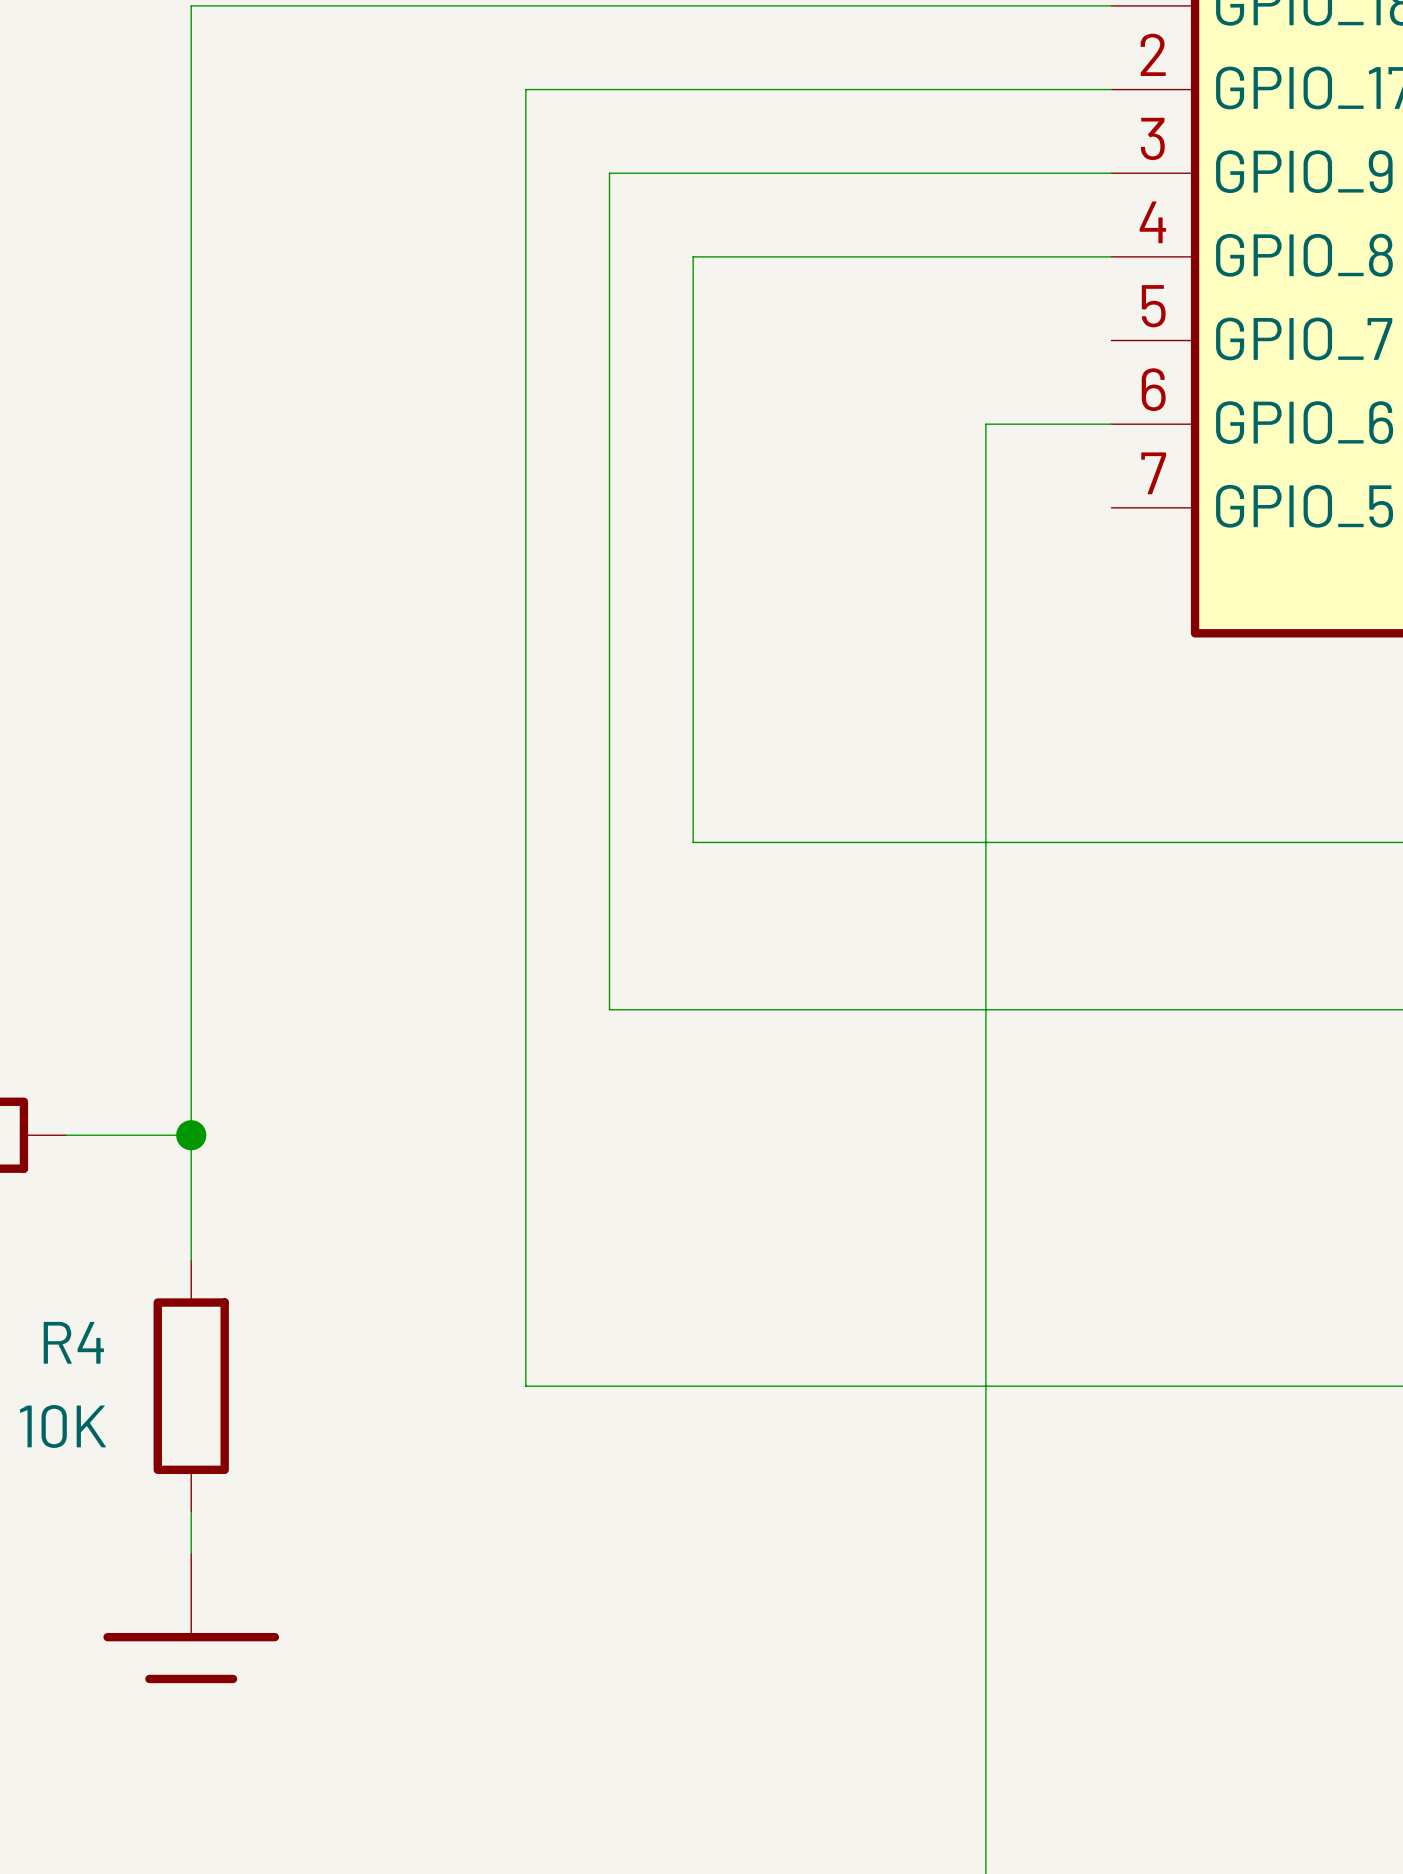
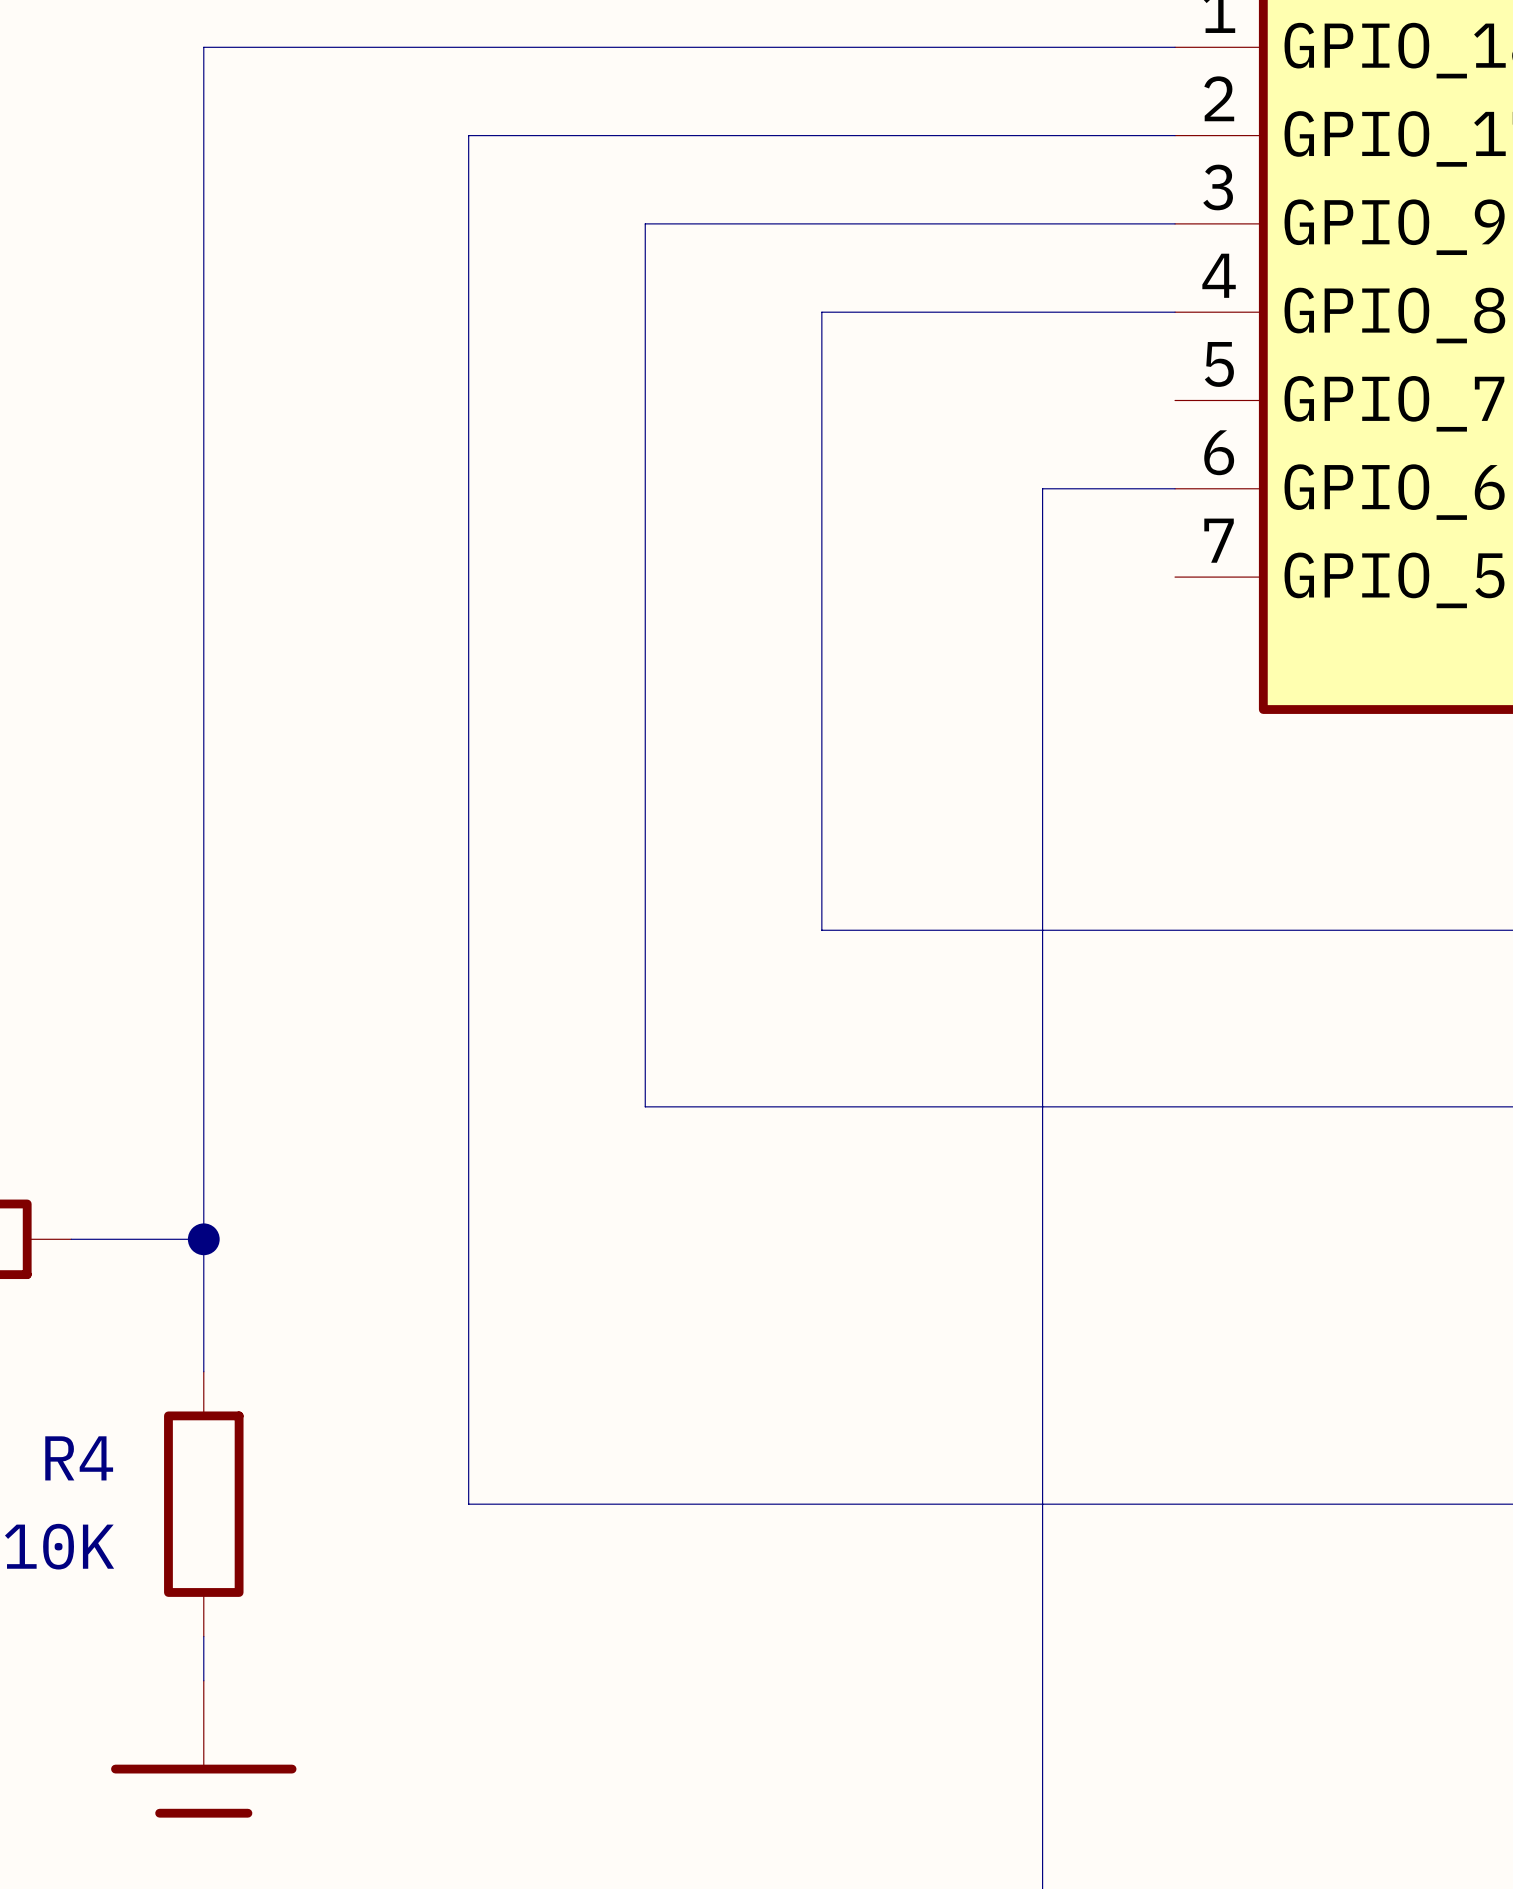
wire: (525, 89) (525, 1386) -> (556, 135) (468, 135) (468, 1504) (556, 1504)
wire: (776, 256) (693, 256) (693, 842) (776, 842) -> (821, 312) (821, 930)

